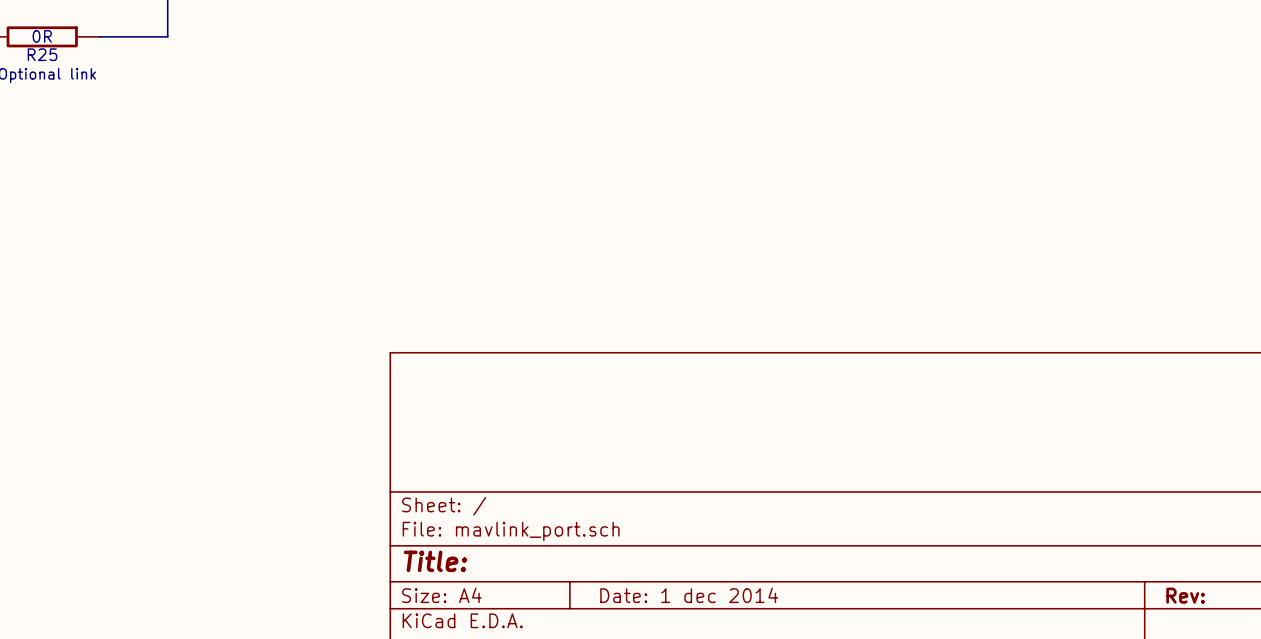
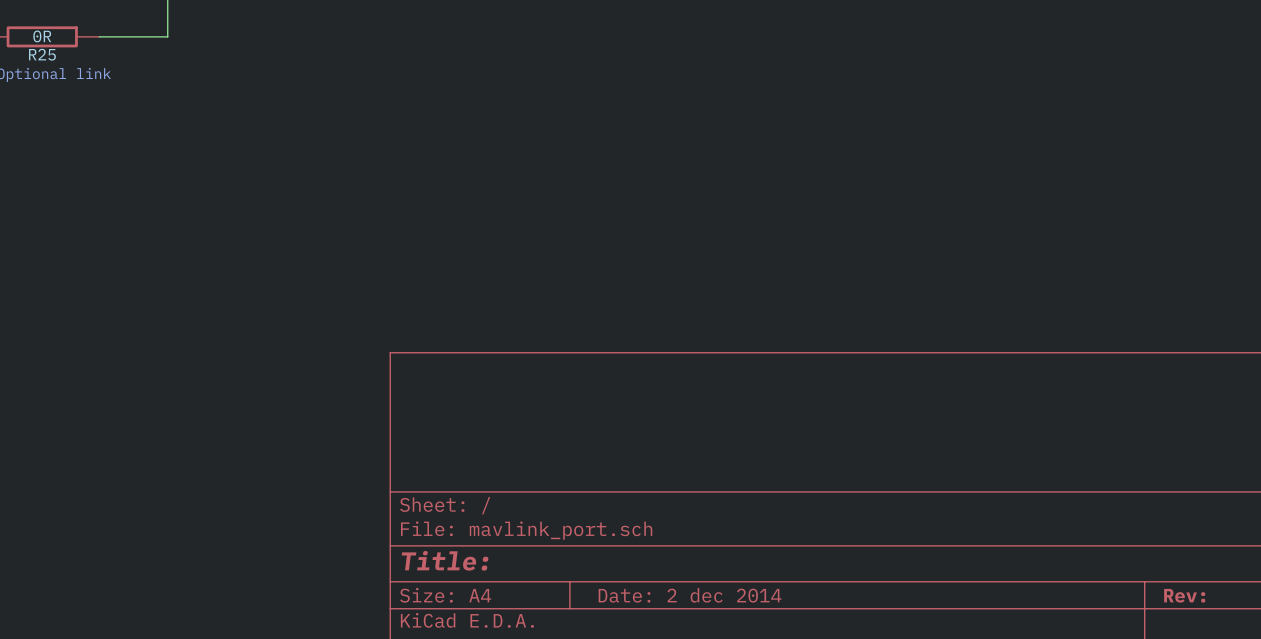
title block: Date: 1 dec 2014 (689, 595) -> Date: 2 dec 2014 (690, 595)

